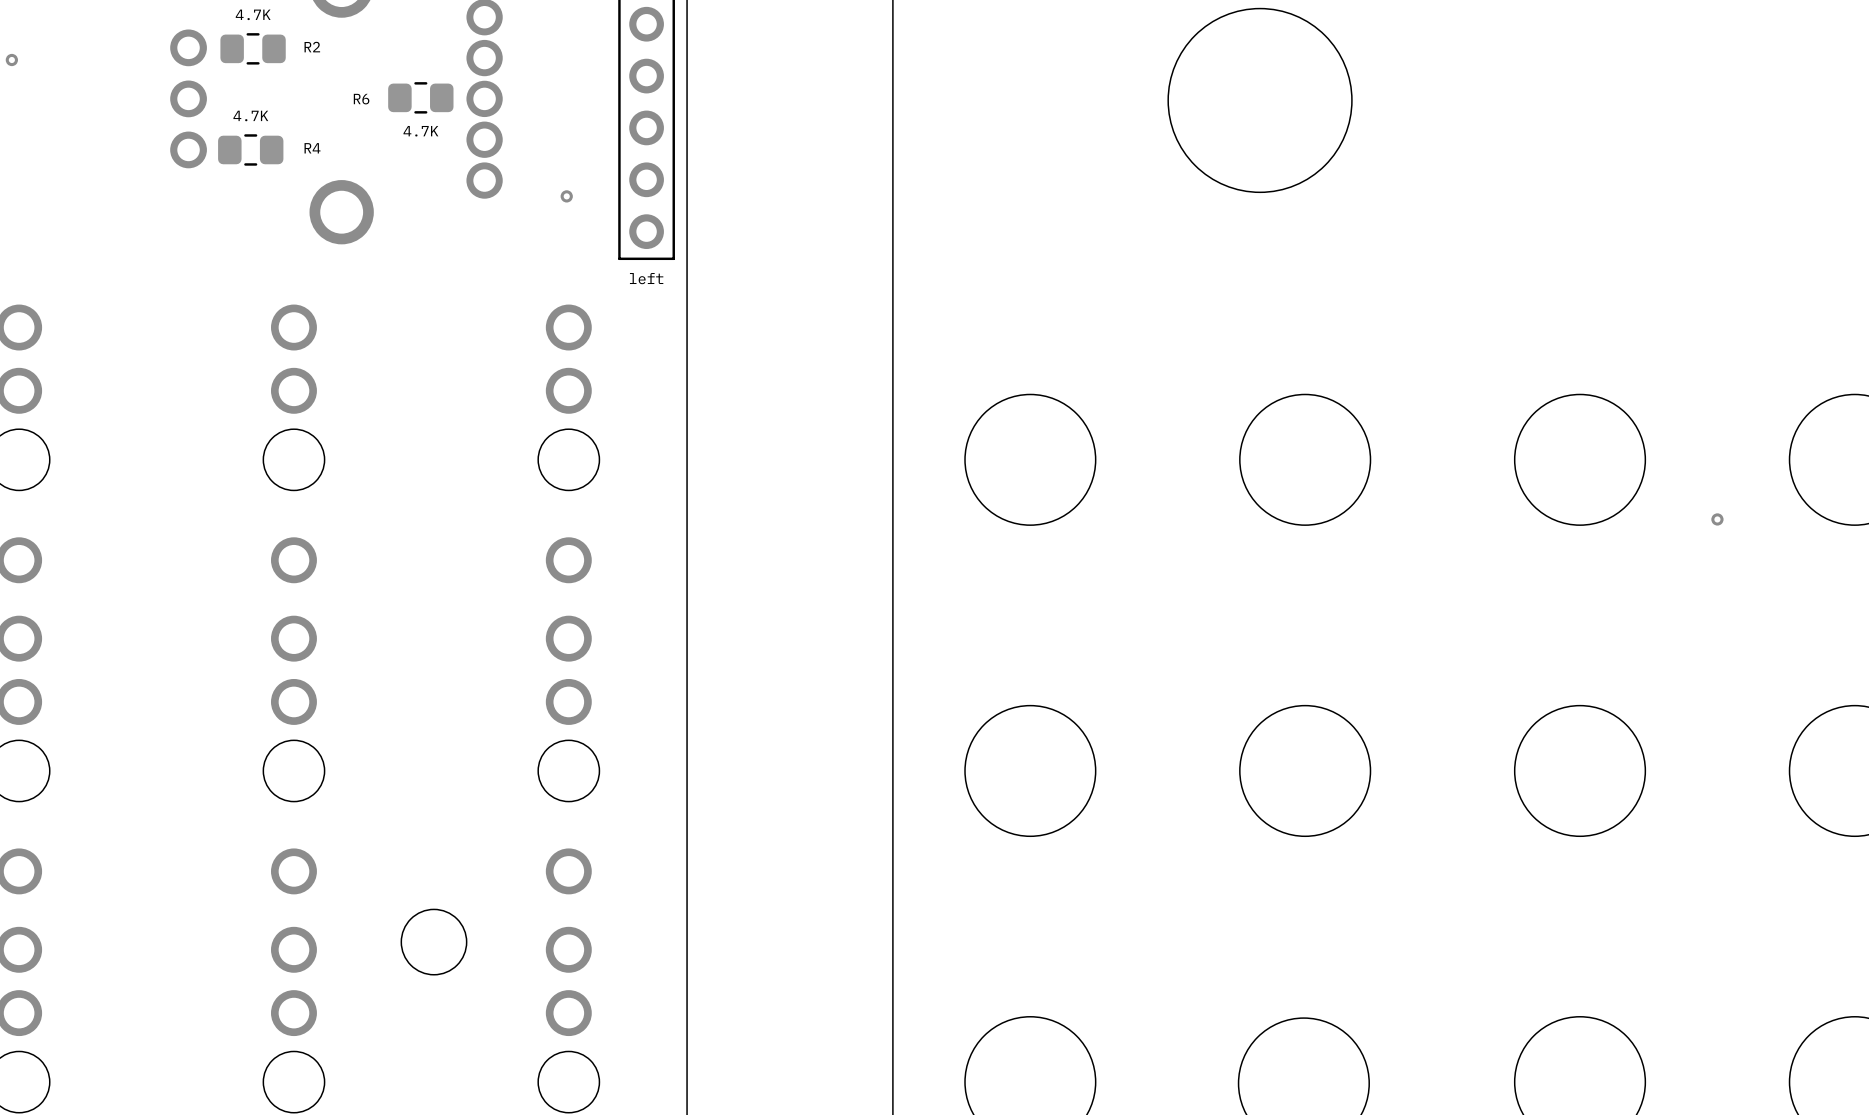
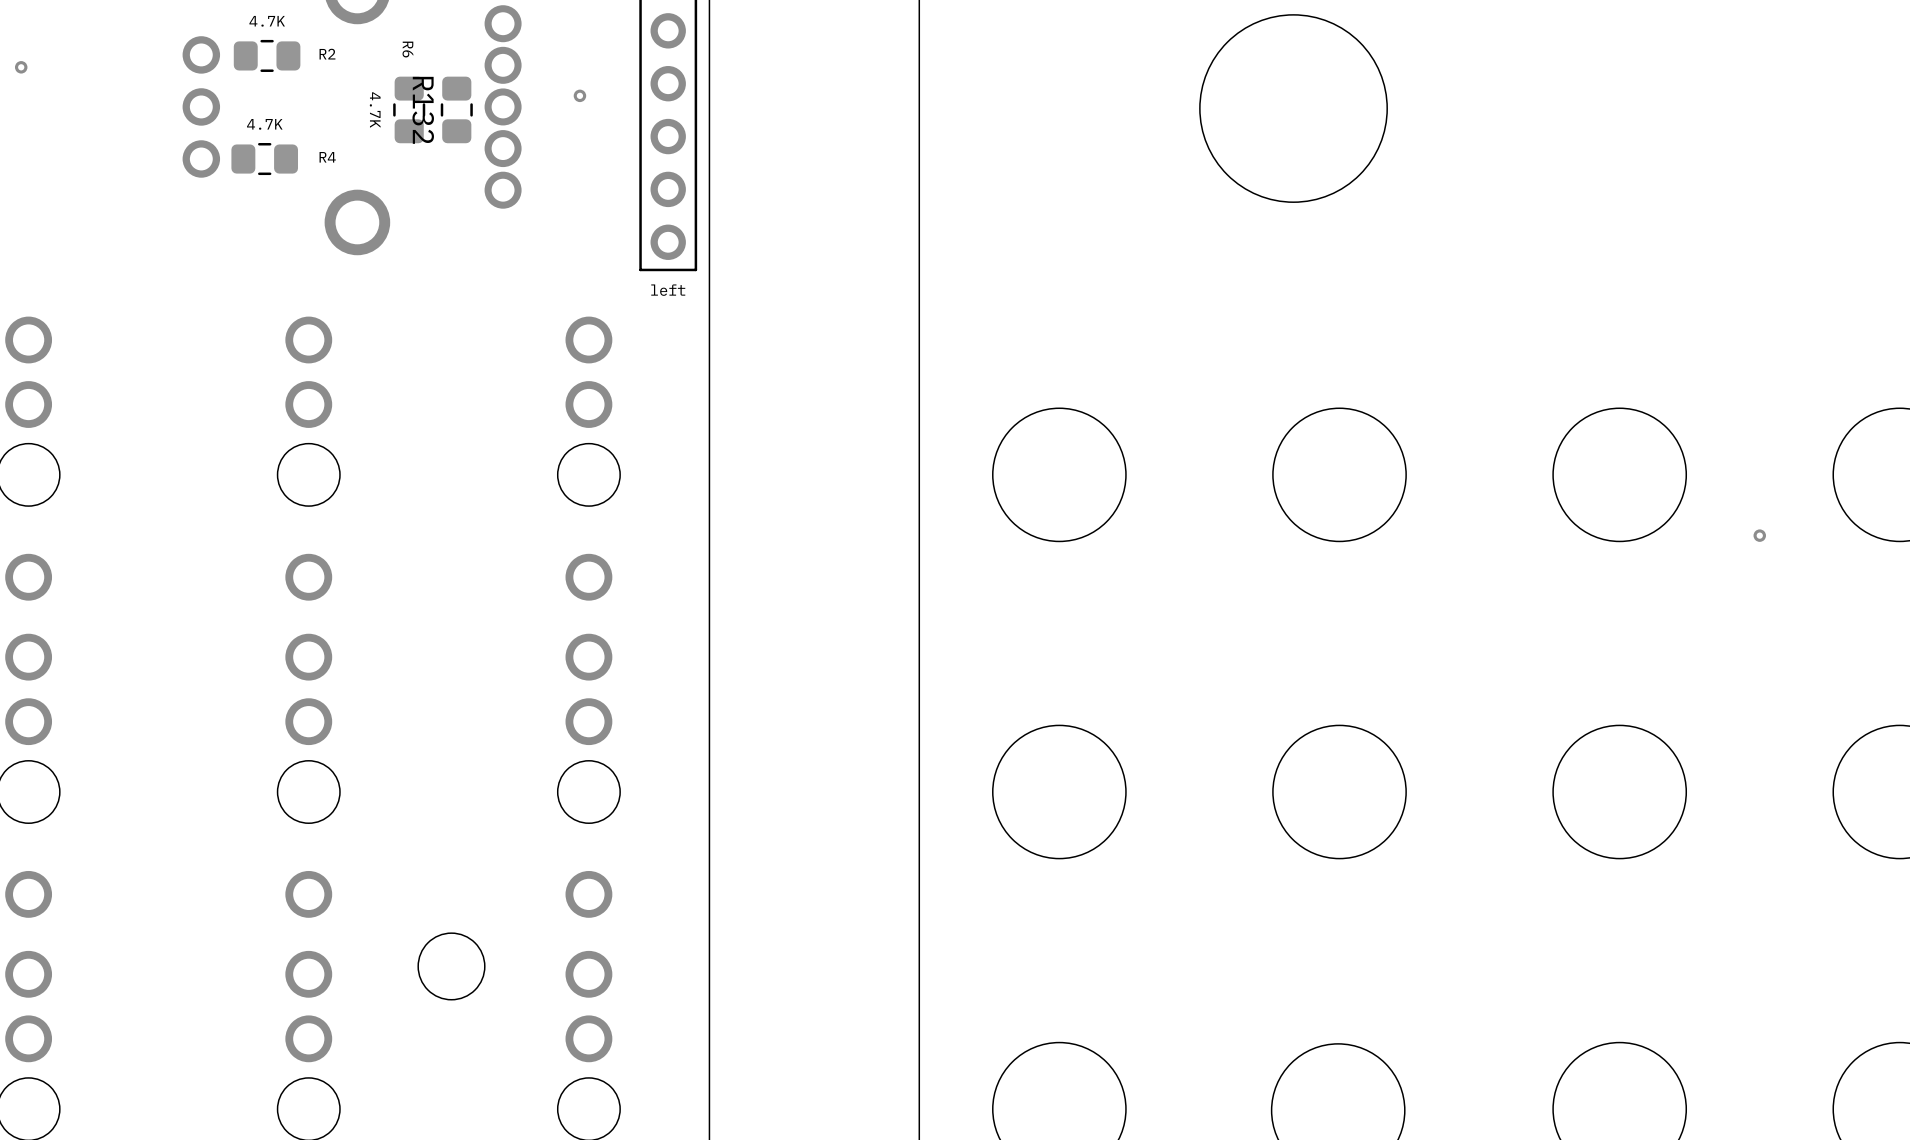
R6 rotation: 0° (420, 97) -> 90° clockwise (409, 109)
R132: none -> (456, 109)
part position: (566, 196) -> (579, 95)

